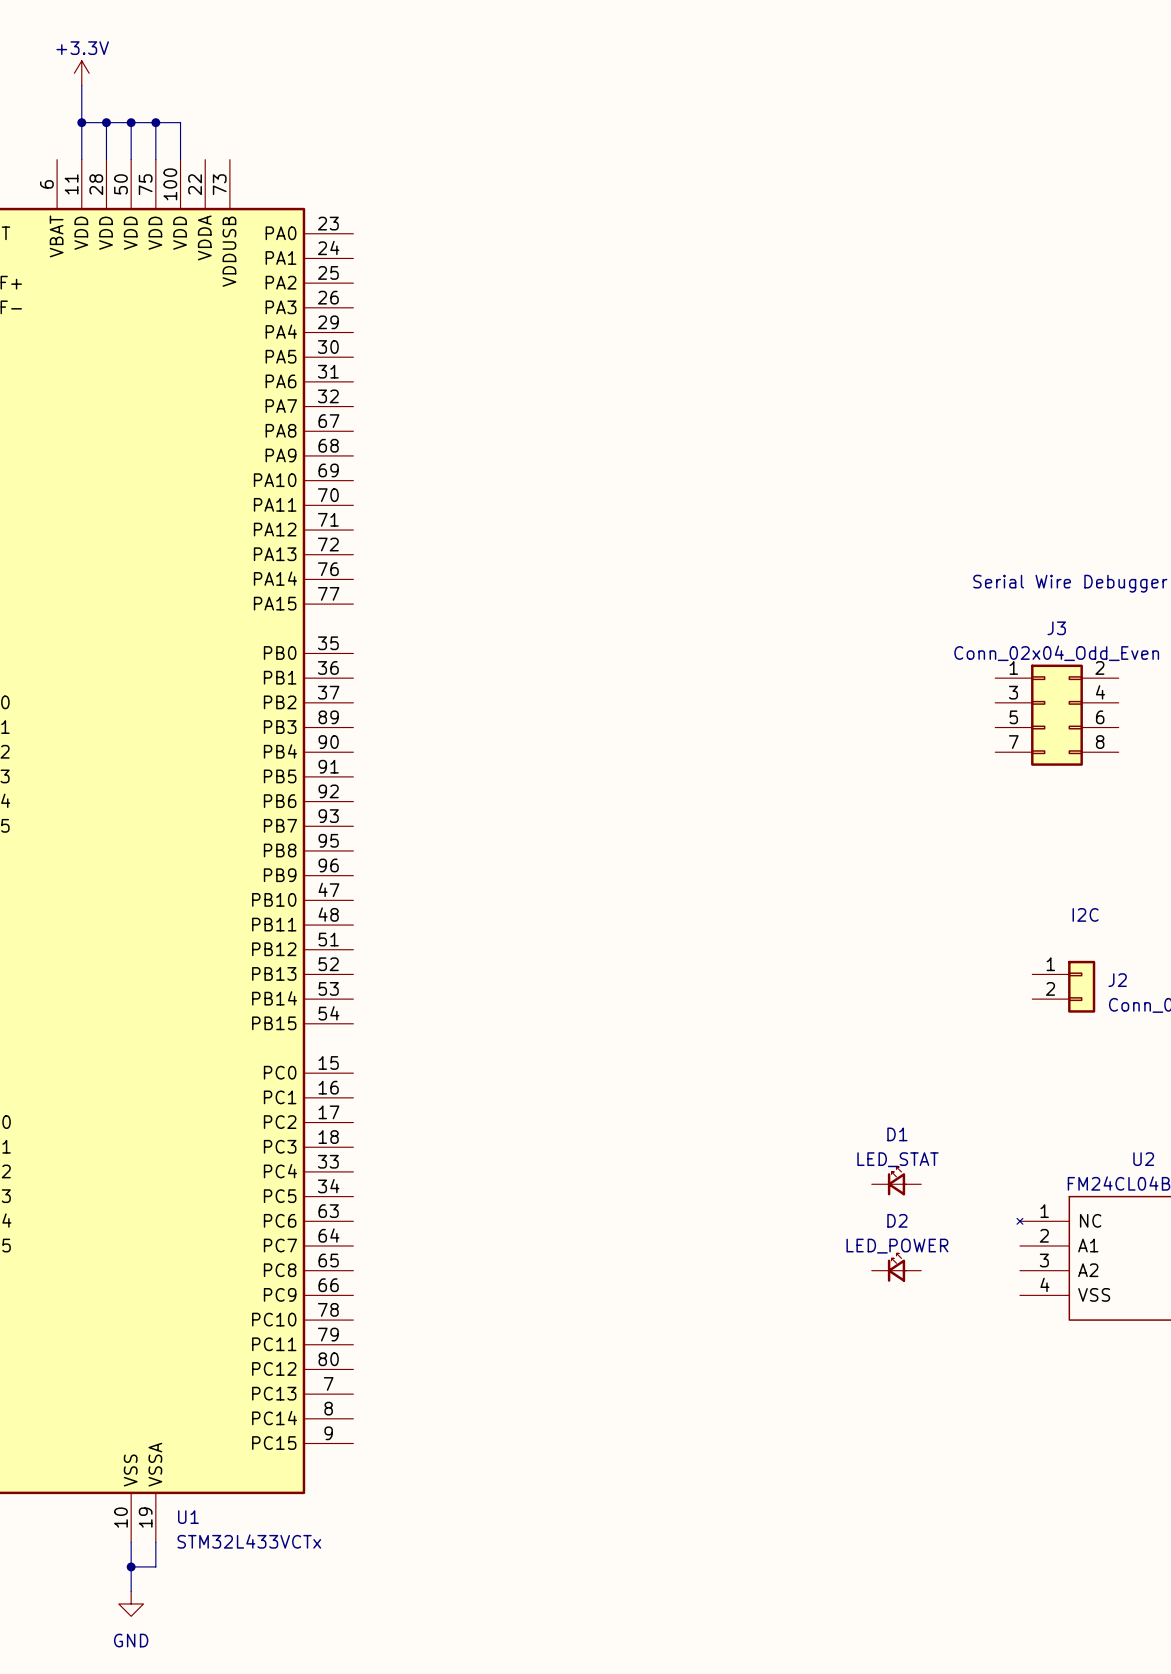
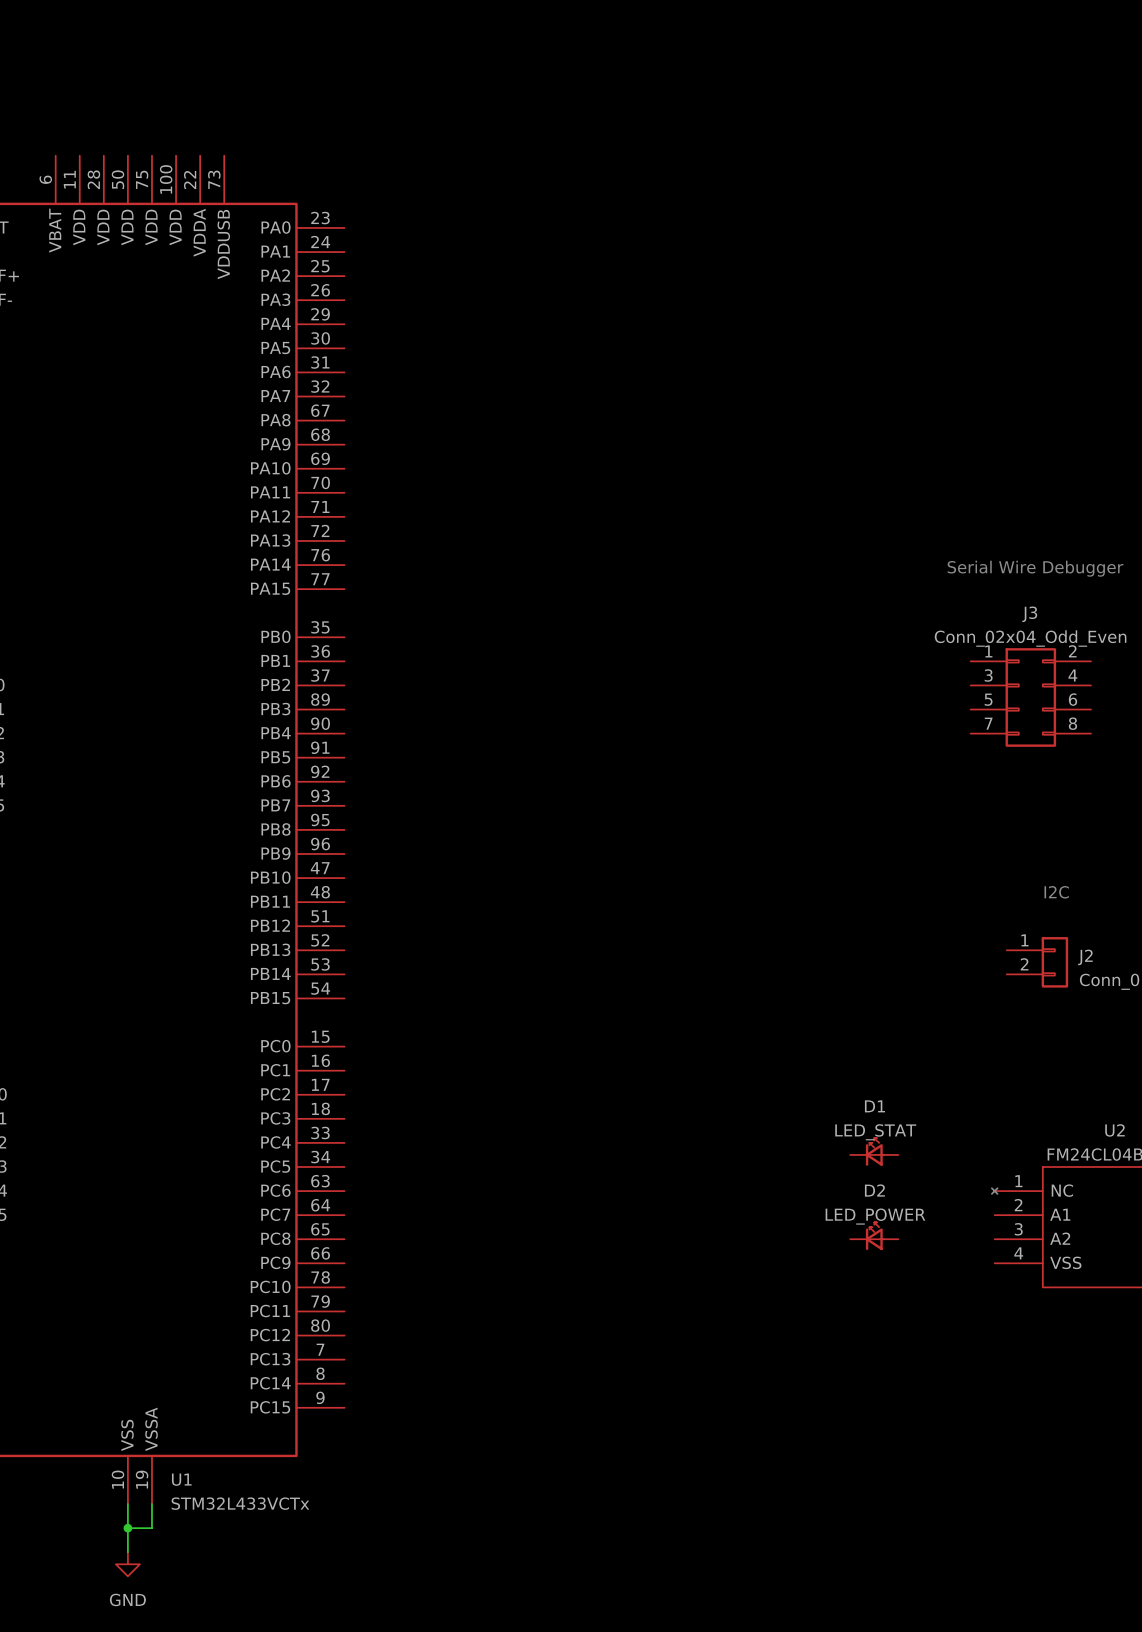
power symbol: +3.3V (81, 73) -> none
wire: (81, 85) (81, 159) -> none
wire: (81, 122) (180, 122) (180, 159) -> none
junction: (81, 122) -> none
wire: (106, 122) (106, 159) -> none
junction: (106, 122) -> none
wire: (131, 122) (131, 159) -> none
junction: (131, 122) -> none
wire: (155, 122) (155, 159) -> none
junction: (155, 122) -> none

